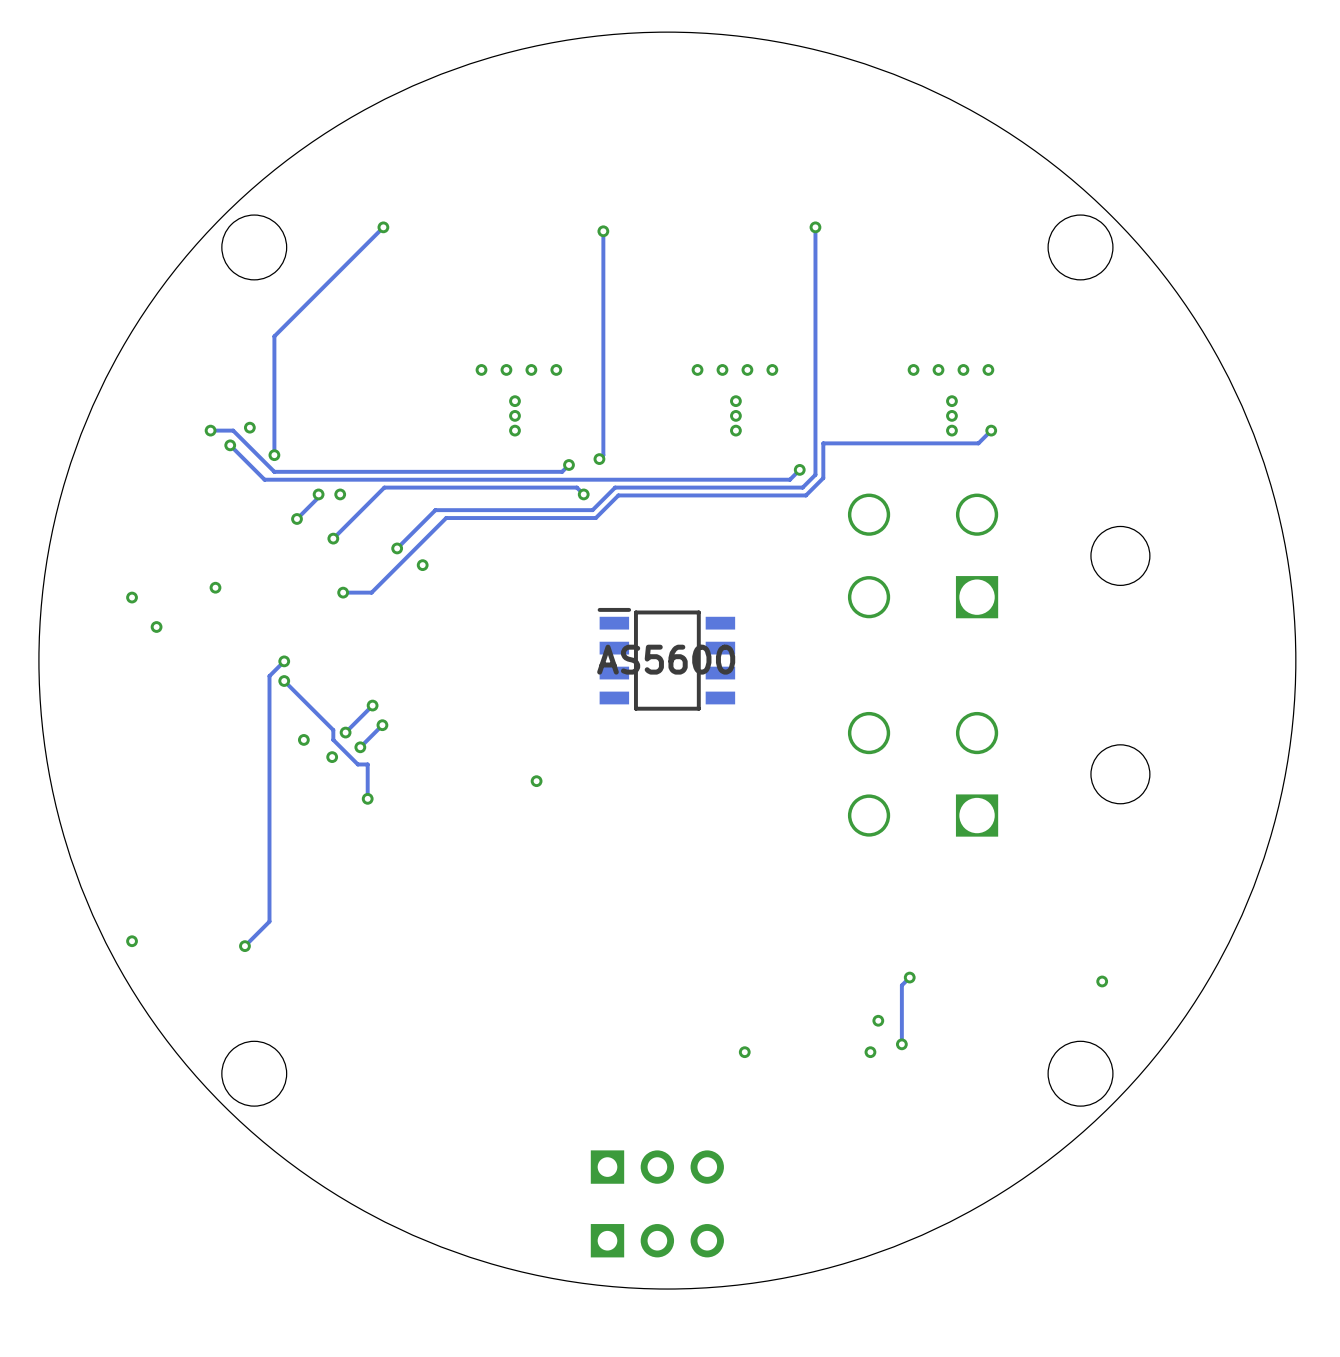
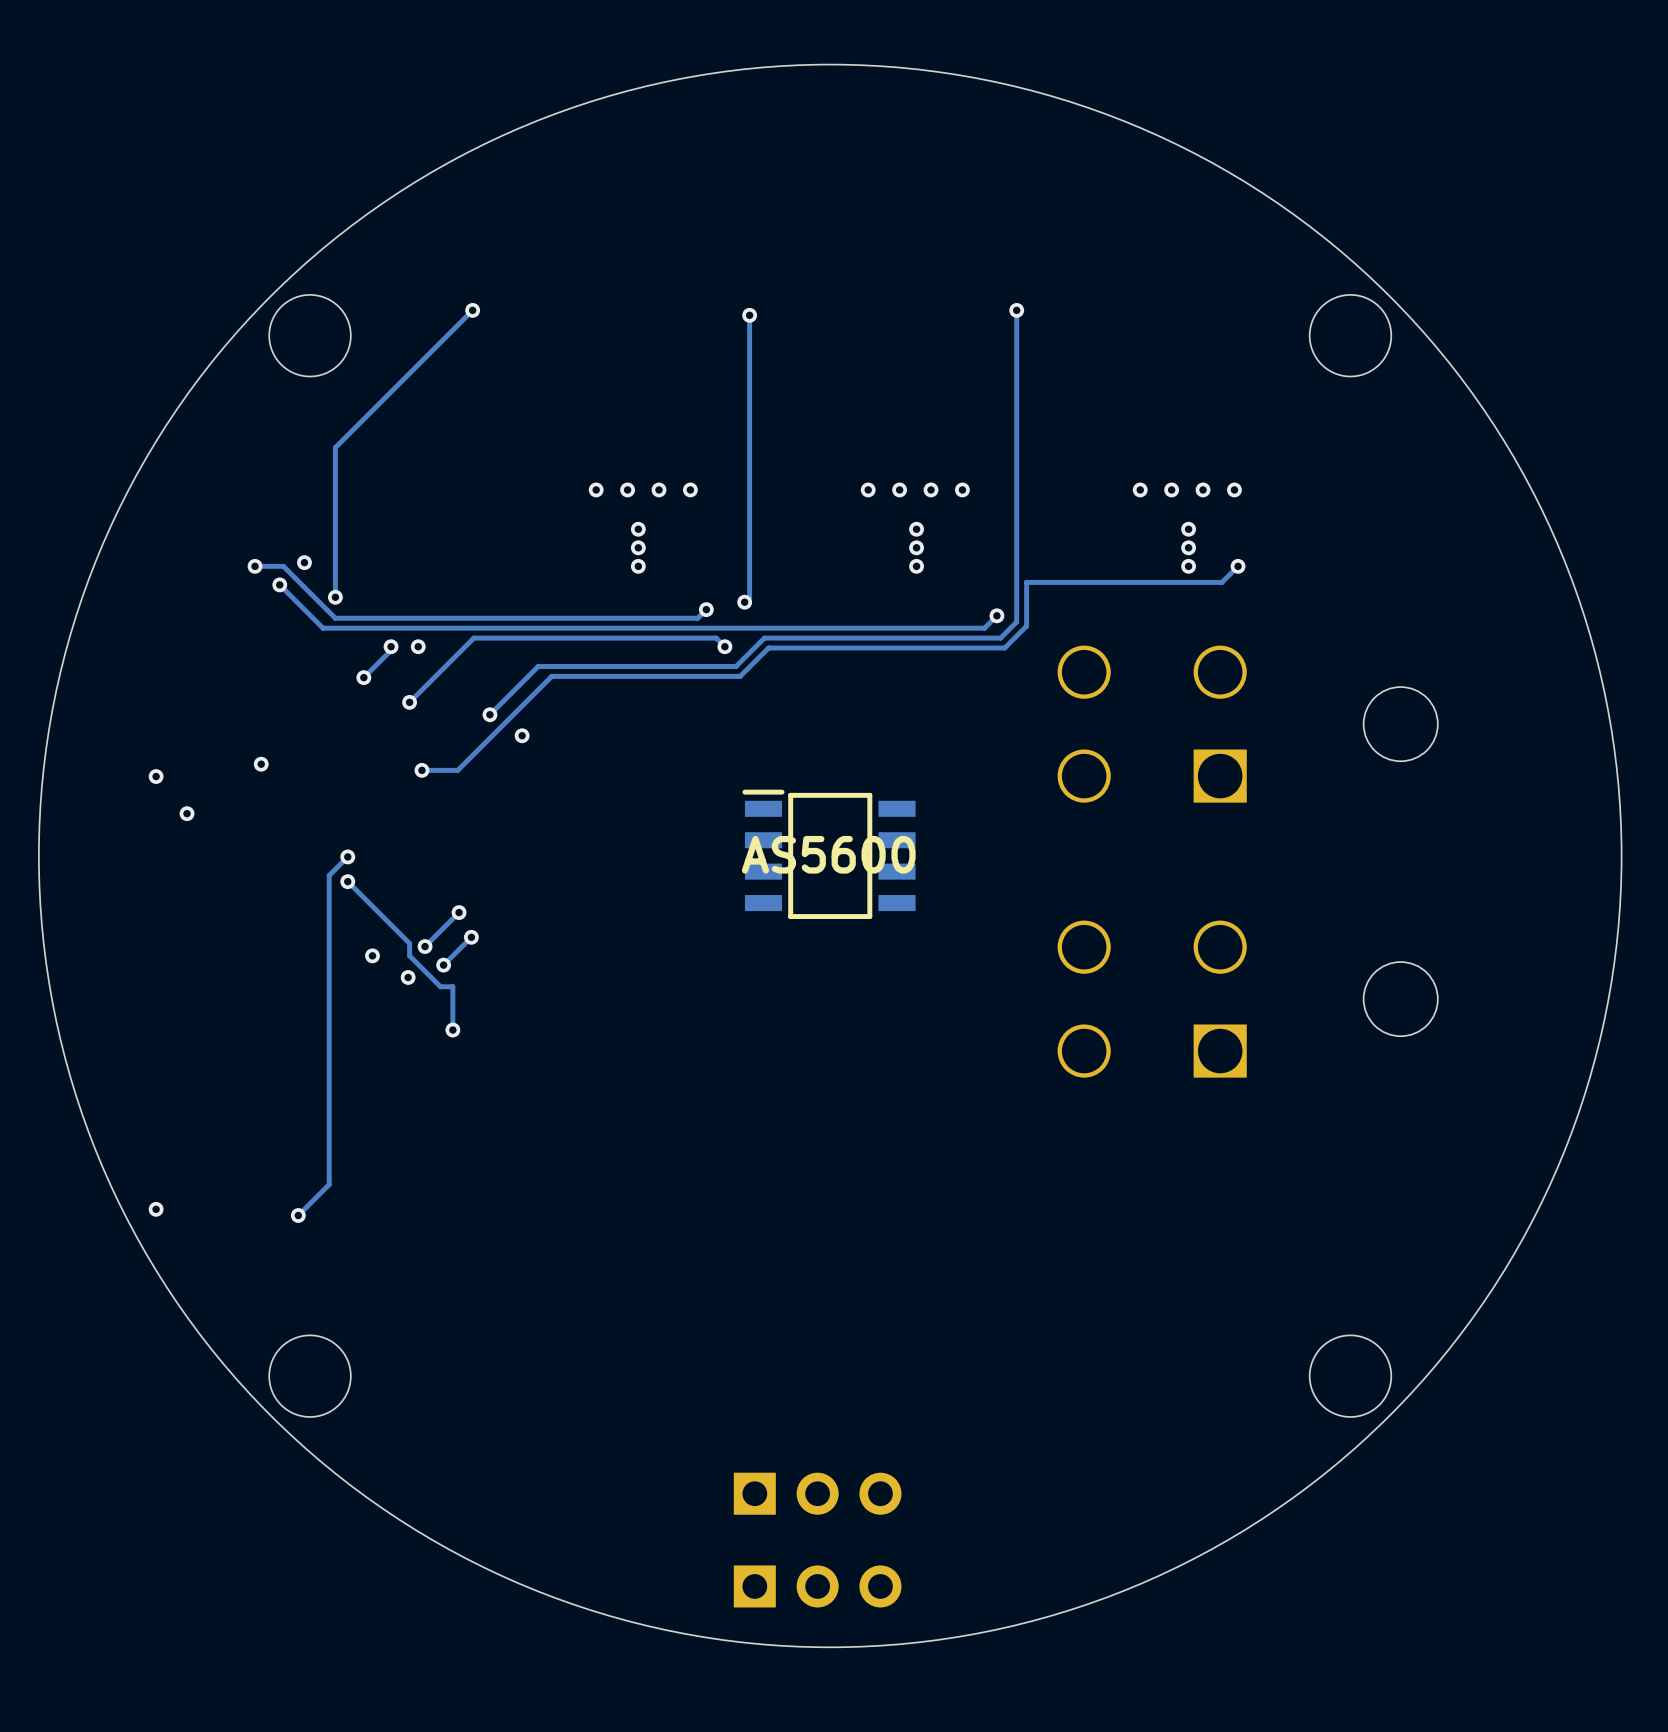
via: (536, 781) -> none
track: (909, 977) (901, 985) (901, 1044) -> none
via: (909, 977) -> none
via: (1102, 981) -> none
via: (878, 1020) -> none
via: (901, 1044) -> none
via: (744, 1052) -> none
via: (870, 1052) -> none

